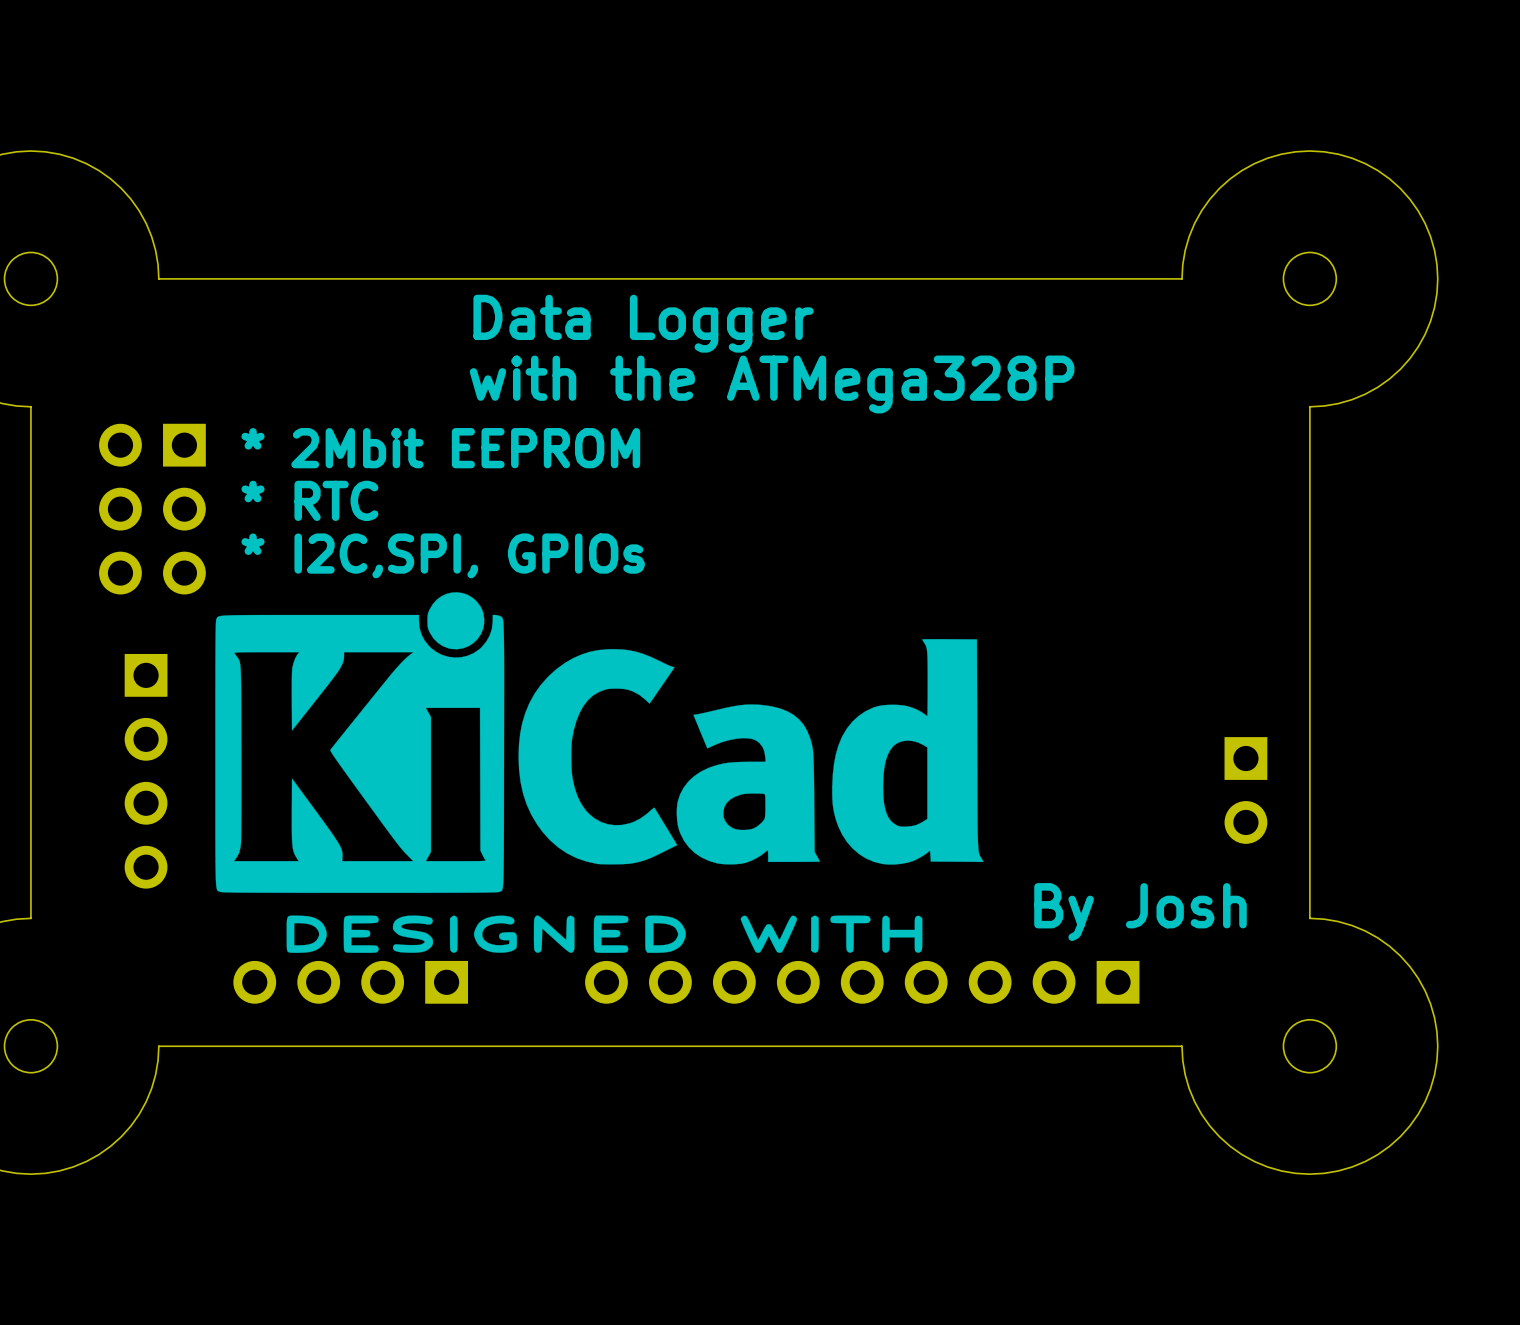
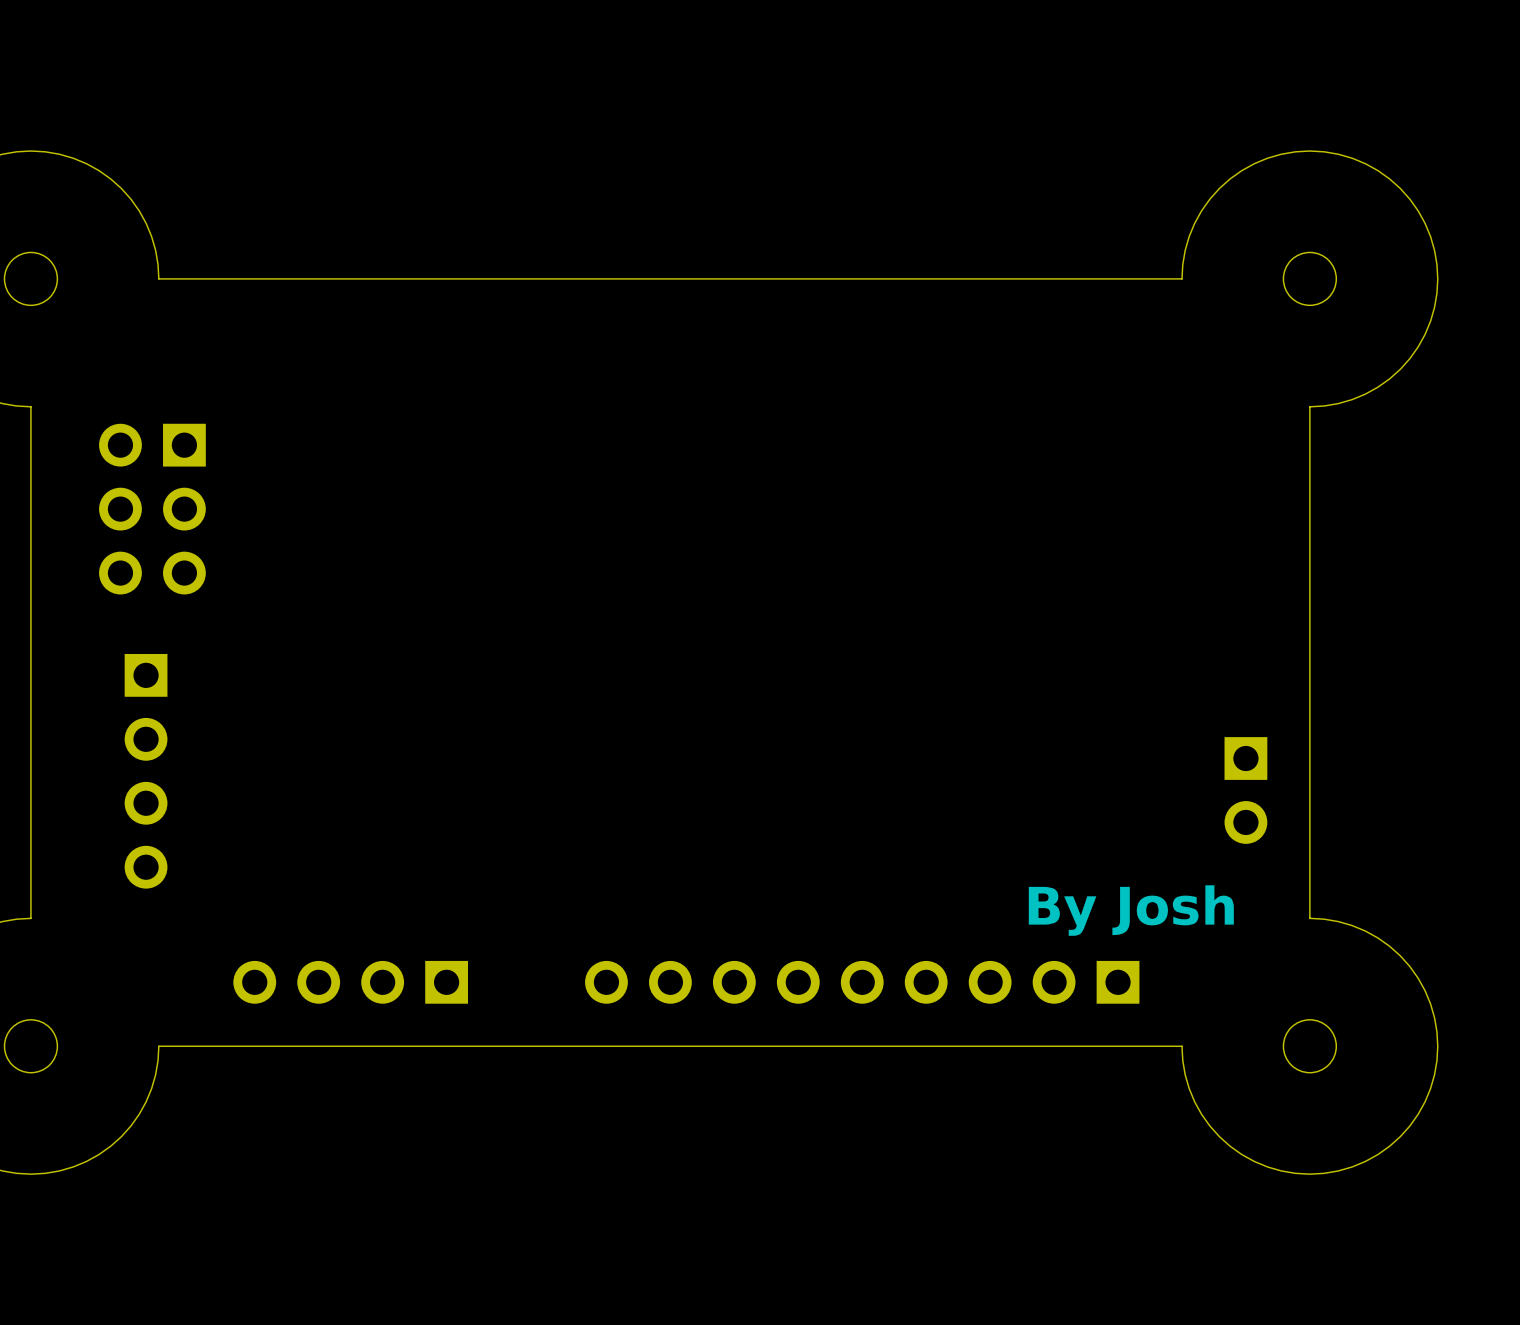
text: Data Logger (643, 323) -> none
text: with the ATMega328P (772, 384) -> none
text: * 2Mbit EEPROM (440, 448) -> none
text: * RTC (309, 500) -> none
text: * I2C,SPI, GPIOs (443, 555) -> none
drawing: [215, 592, 984, 953] -> none

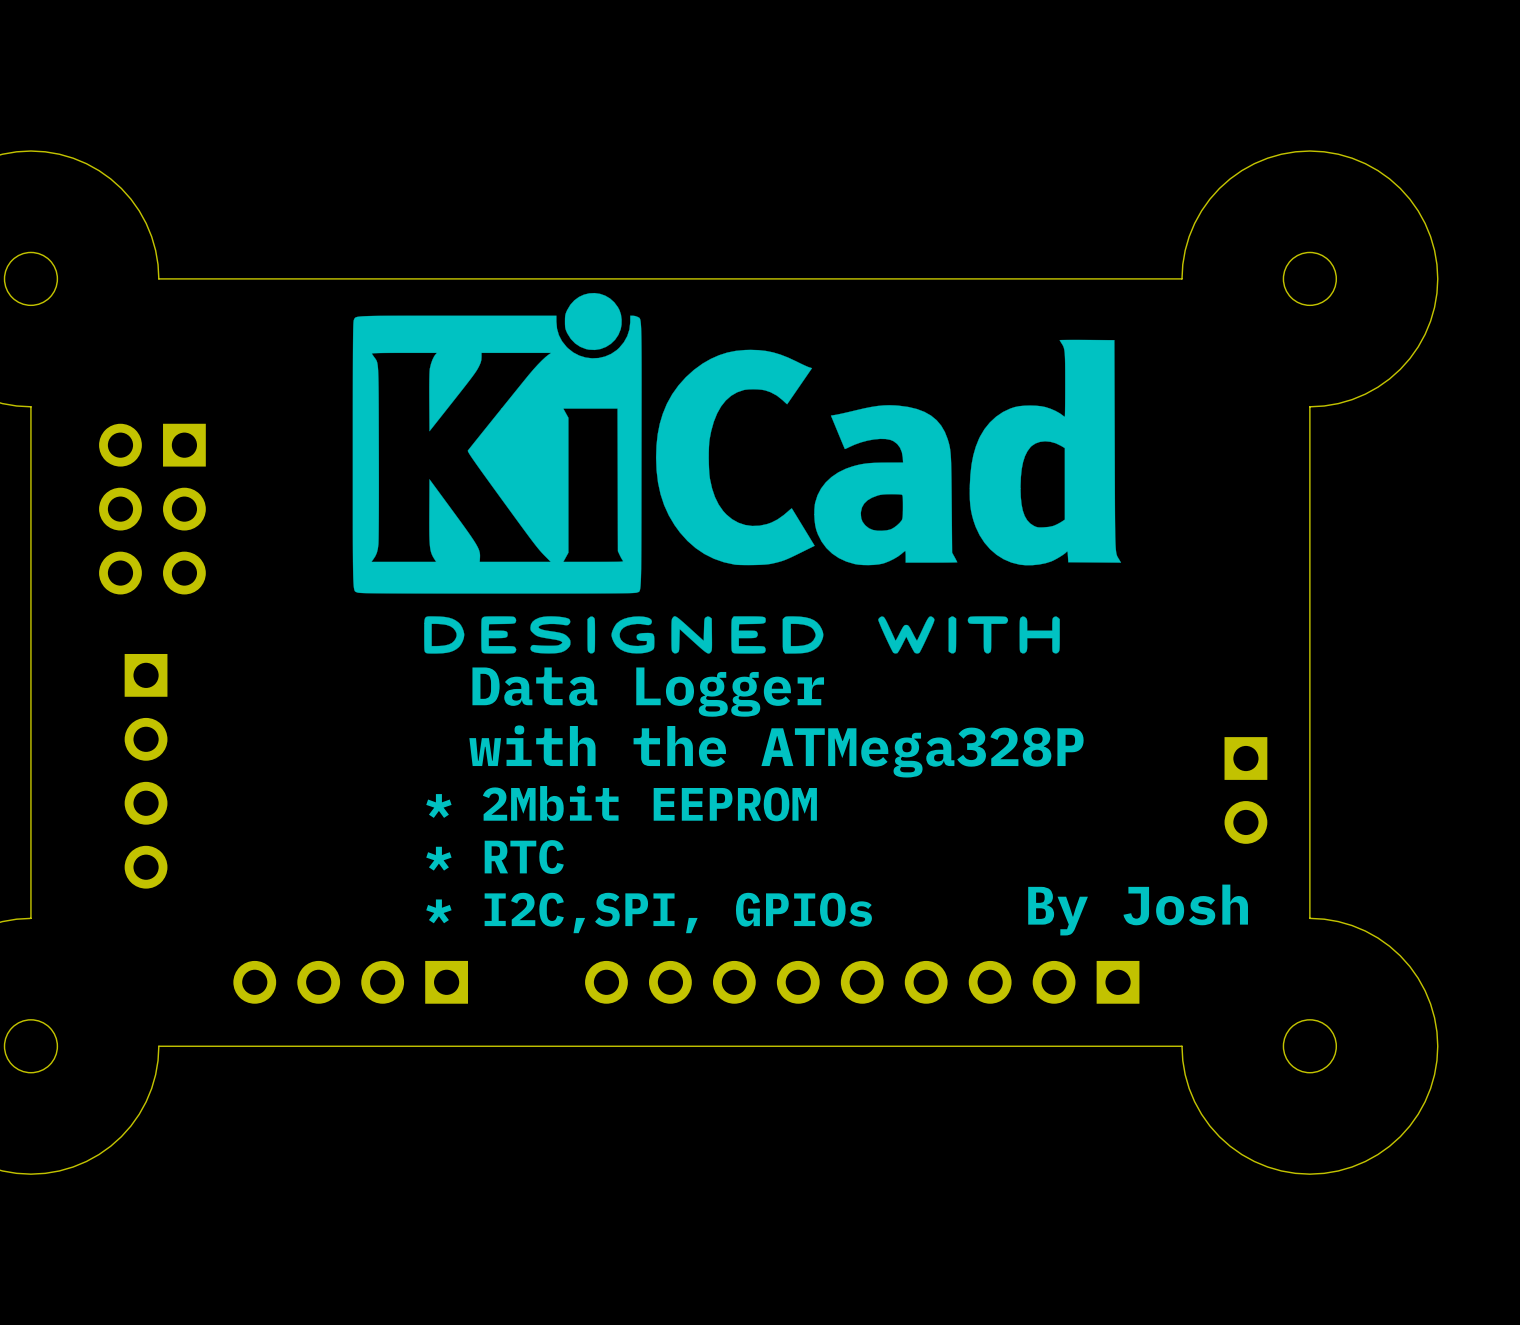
drawing: none -> [352, 292, 1122, 654]
text: none -> Data Logger (648, 692)
text: none -> with the ATMega328P (776, 751)
text: none -> * 2Mbit EEPROM (621, 803)
text: none -> * RTC (495, 857)
text: none -> * I2C,SPI, GPIOs (649, 912)

